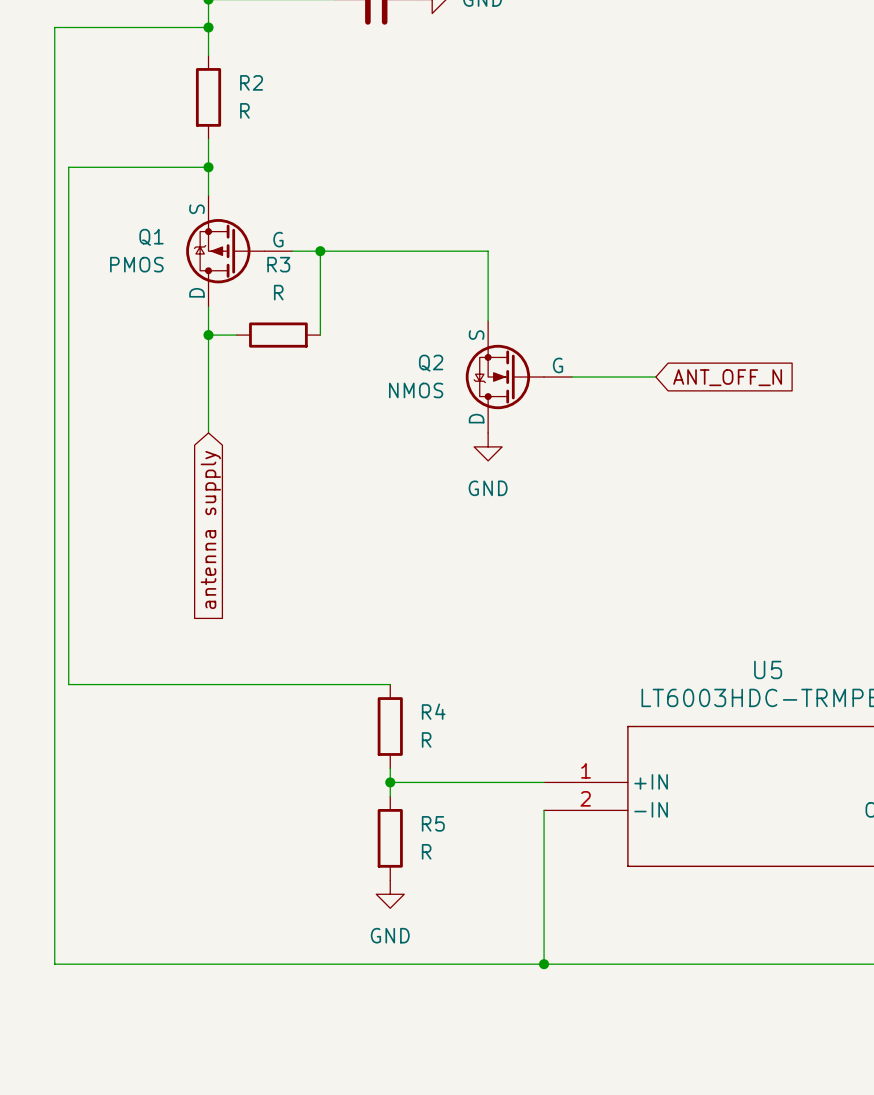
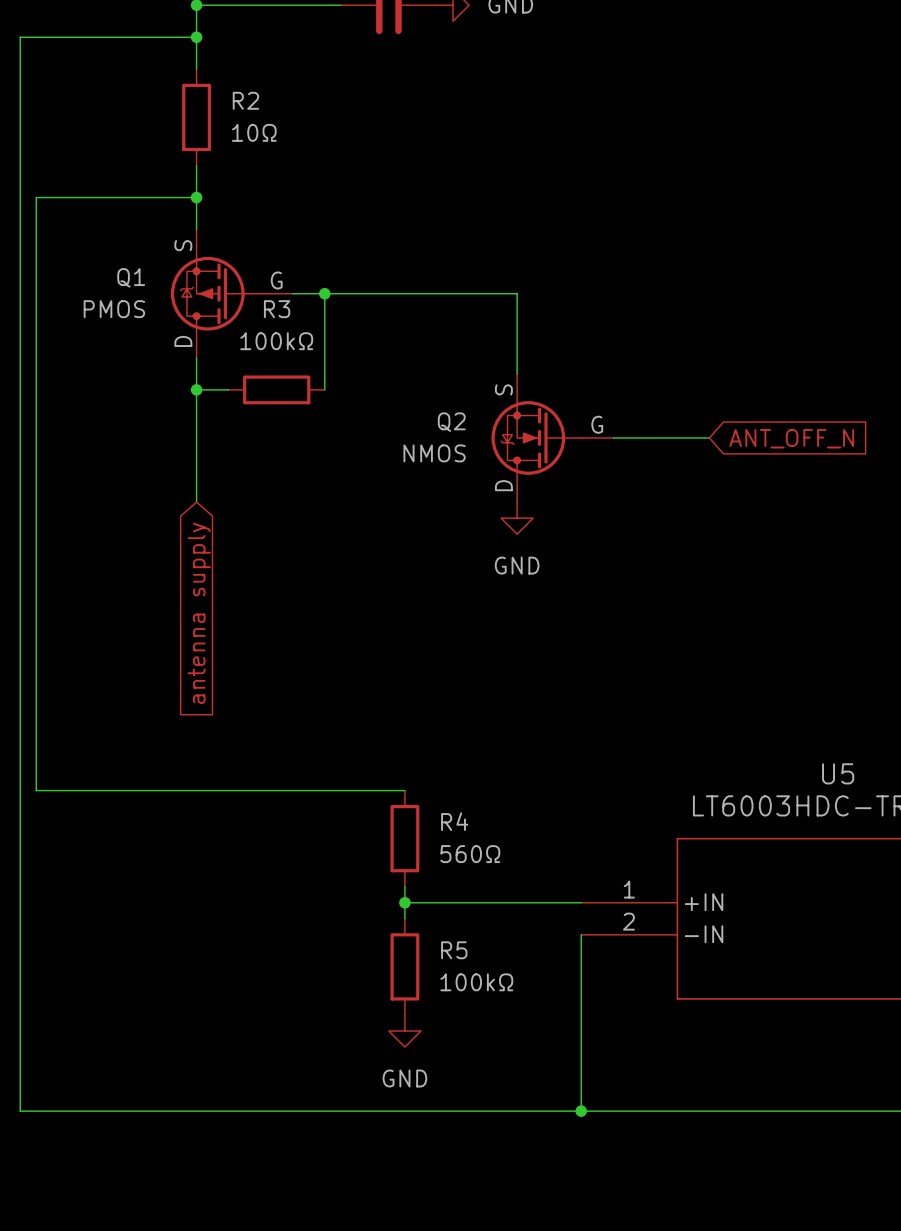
R2 value: R (244, 110) -> 10Ω (254, 132)
R3 value: R (278, 292) -> 100kΩ (276, 341)
R4 value: R (426, 739) -> 560Ω (470, 854)
R5 value: R (426, 851) -> 100kΩ (476, 982)

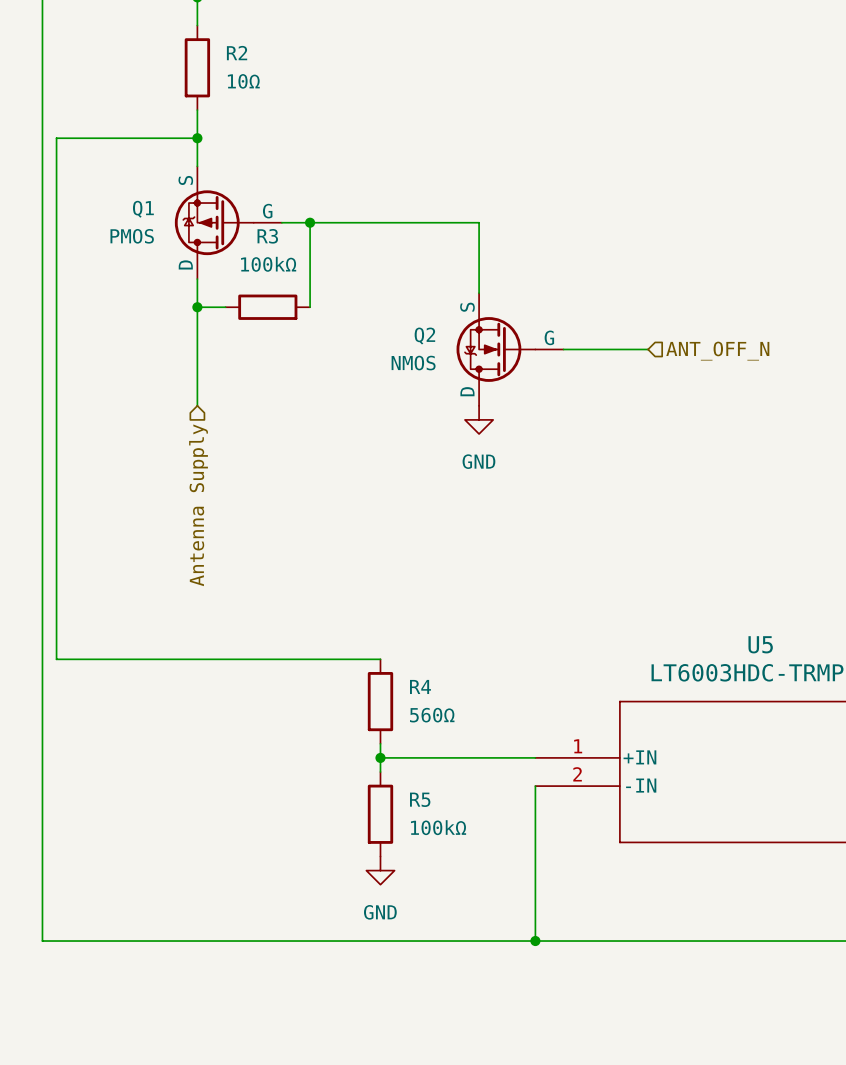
global label: ANT_OFF_N (791, 438) -> none
hierarchical label: none -> ANT_OFF_N (717, 351)
global label: antenna supply (199, 613) -> none
hierarchical label: none -> Antenna Supply (198, 505)

